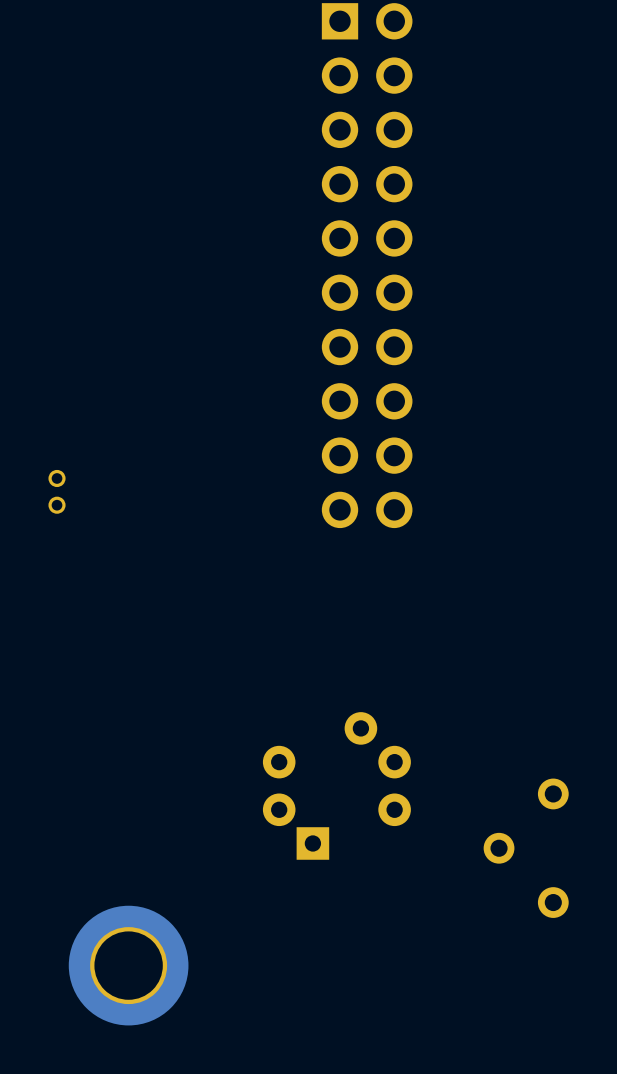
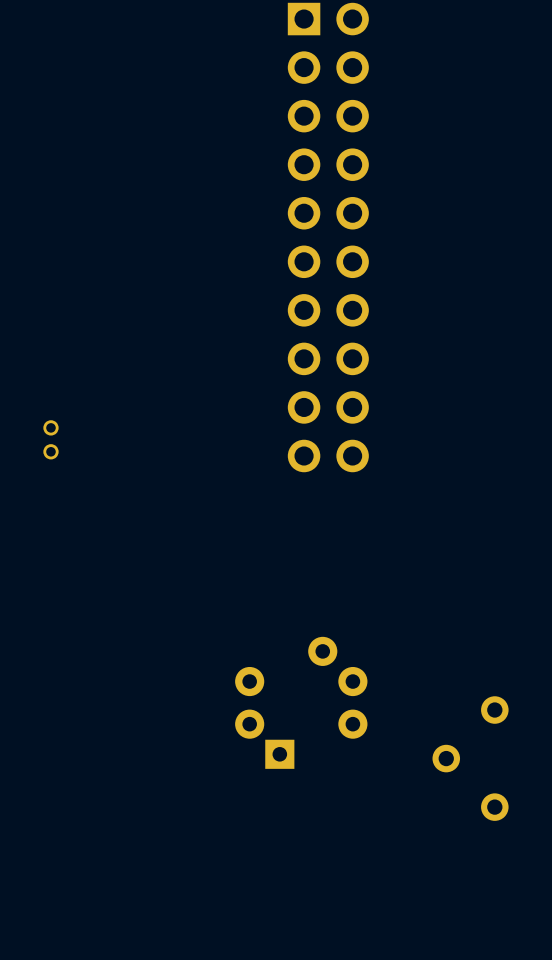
part: (128, 965) -> none

